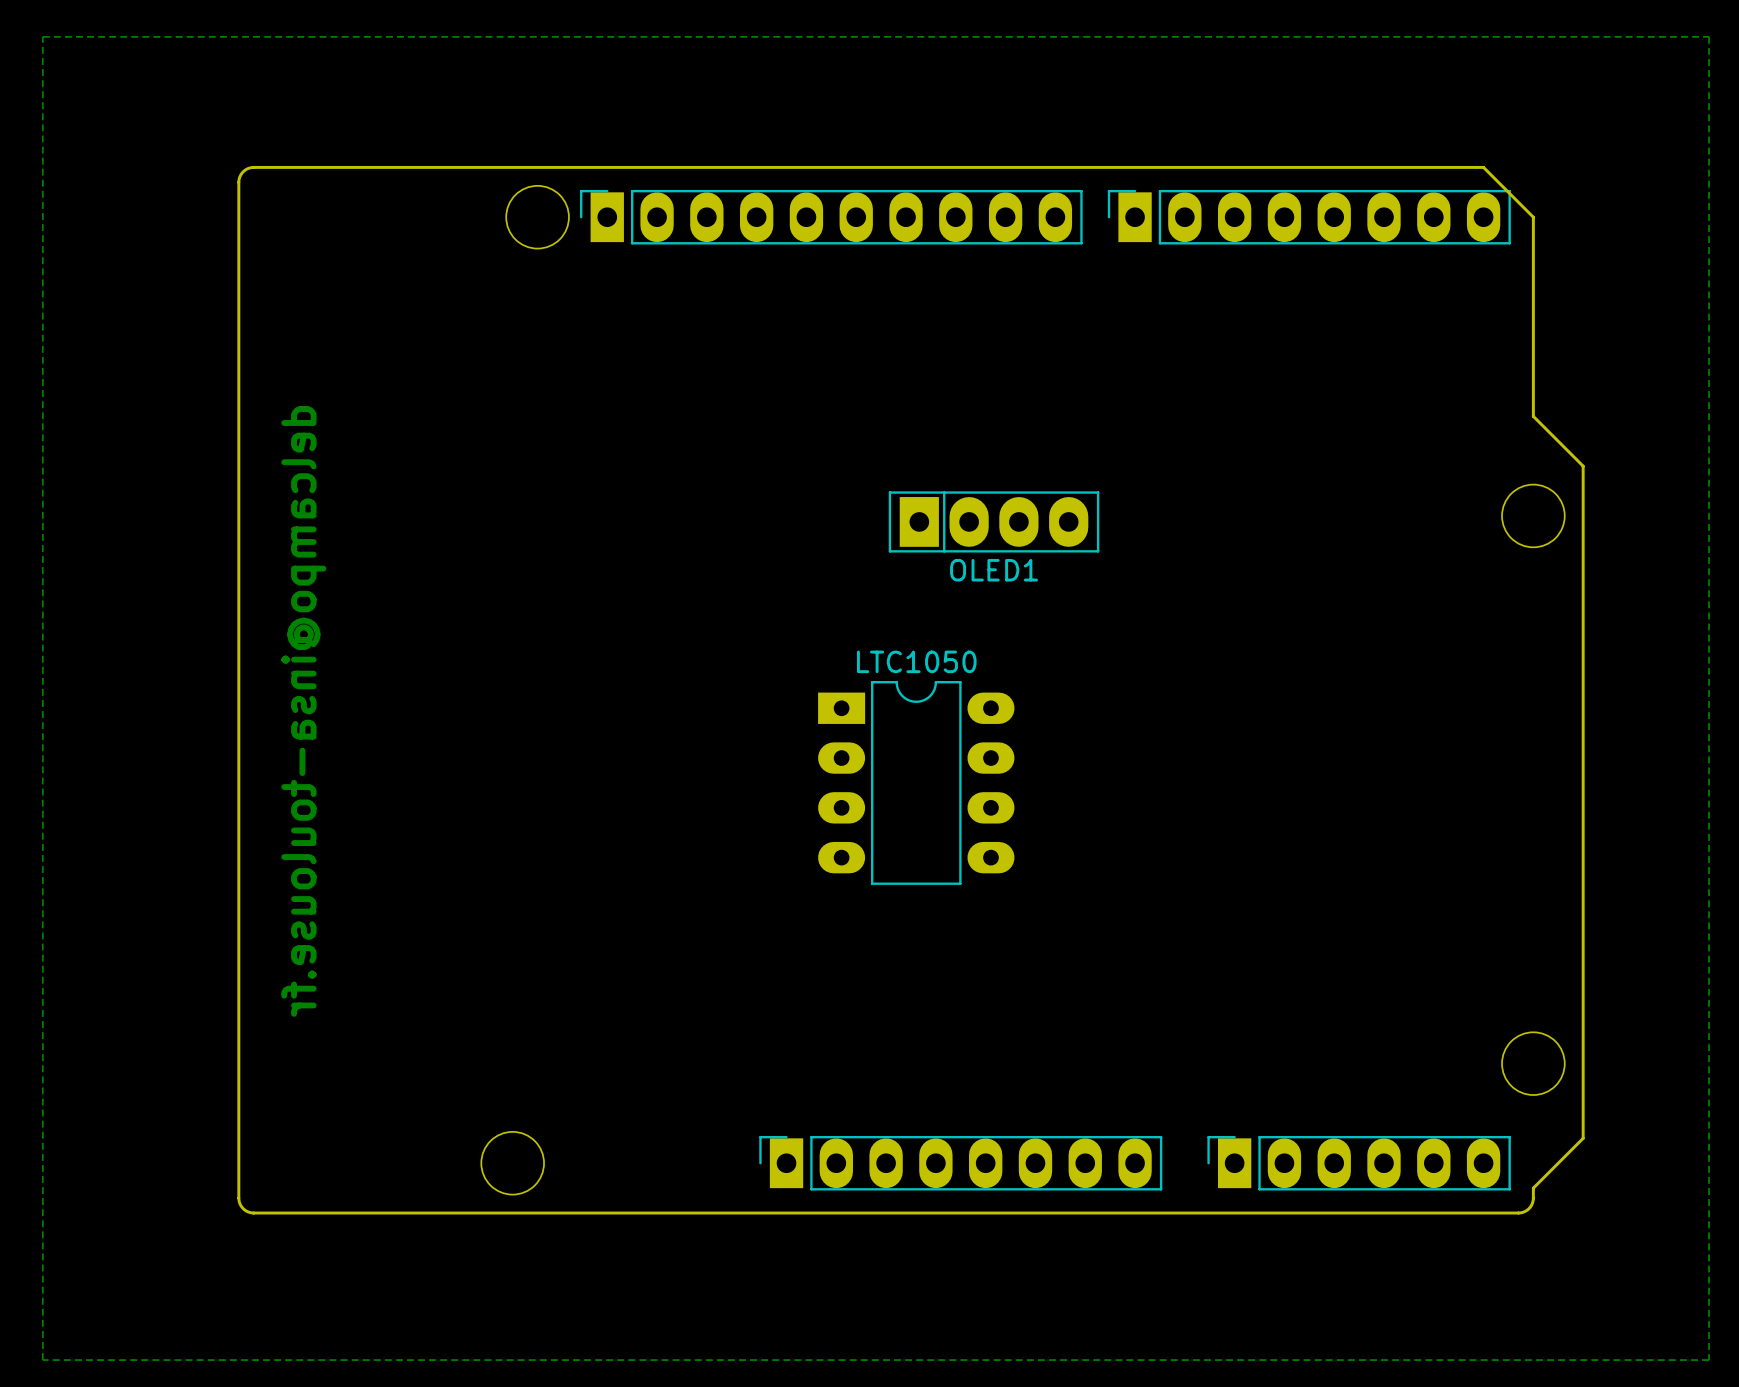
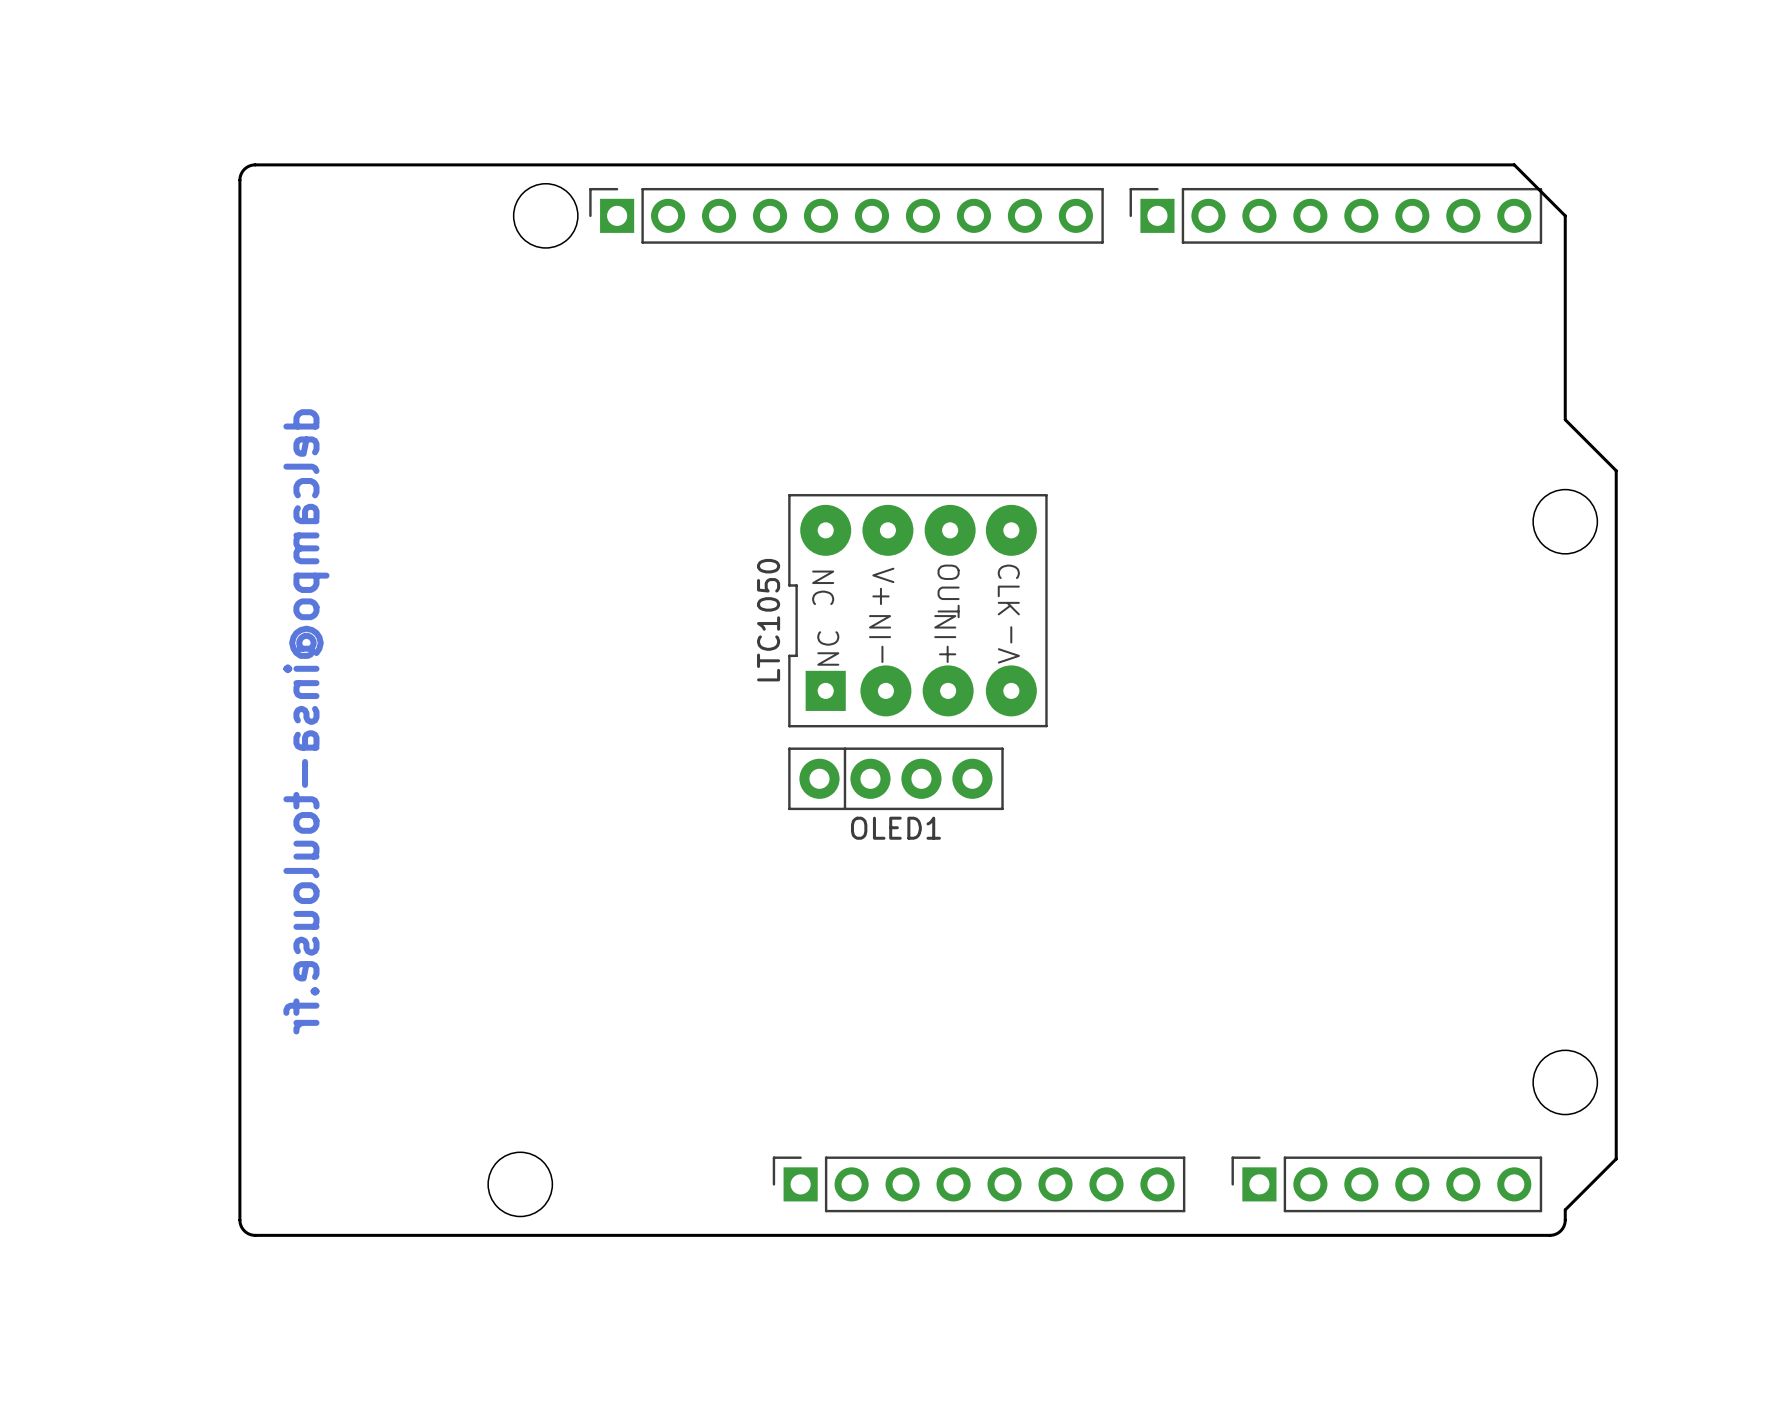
bottom zone outline: (42, 36) (42, 1360) (1709, 1360) (1709, 36) (42, 36) -> none
part footprint: [580, 189, 1083, 245] -> [589, 187, 1104, 244]
part footprint: [1107, 189, 1511, 245] -> [1129, 187, 1543, 244]
OLED1 footprint: [888, 491, 1100, 553] -> [788, 747, 1004, 811]
LTC1050 name position: LTC1050 (916, 661) -> LTC1050 (768, 620)
LTC1050 footprint: [818, 681, 1015, 885] -> [788, 494, 1048, 728]
part footprint: [759, 1135, 1163, 1191] -> [772, 1156, 1186, 1213]
part footprint: [1207, 1135, 1511, 1191] -> [1231, 1156, 1543, 1213]

